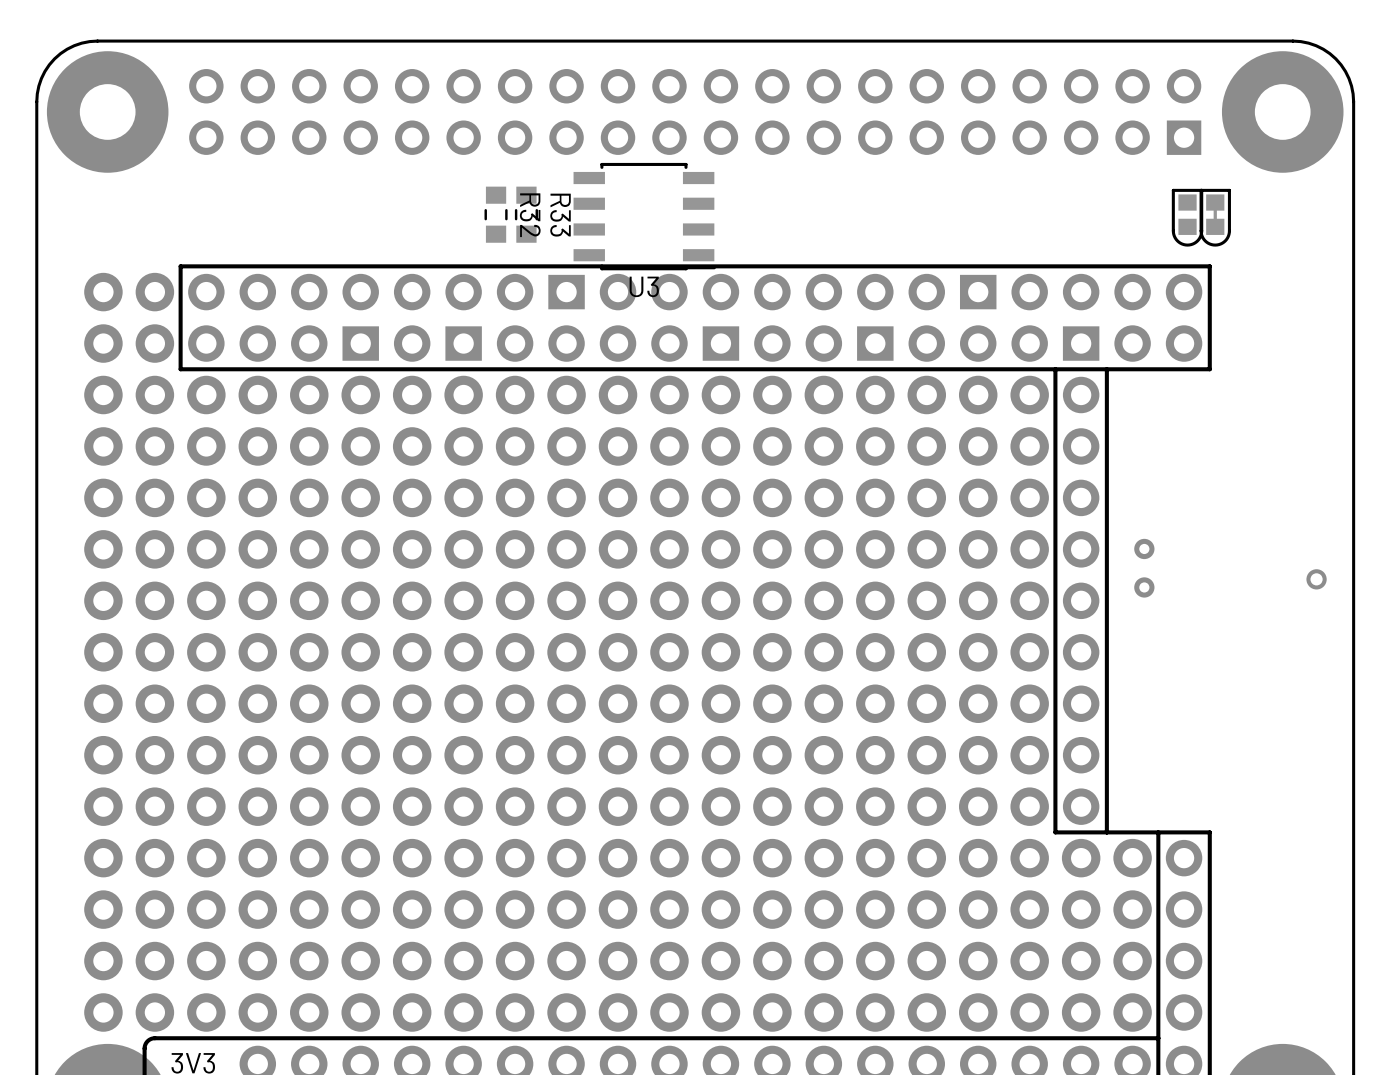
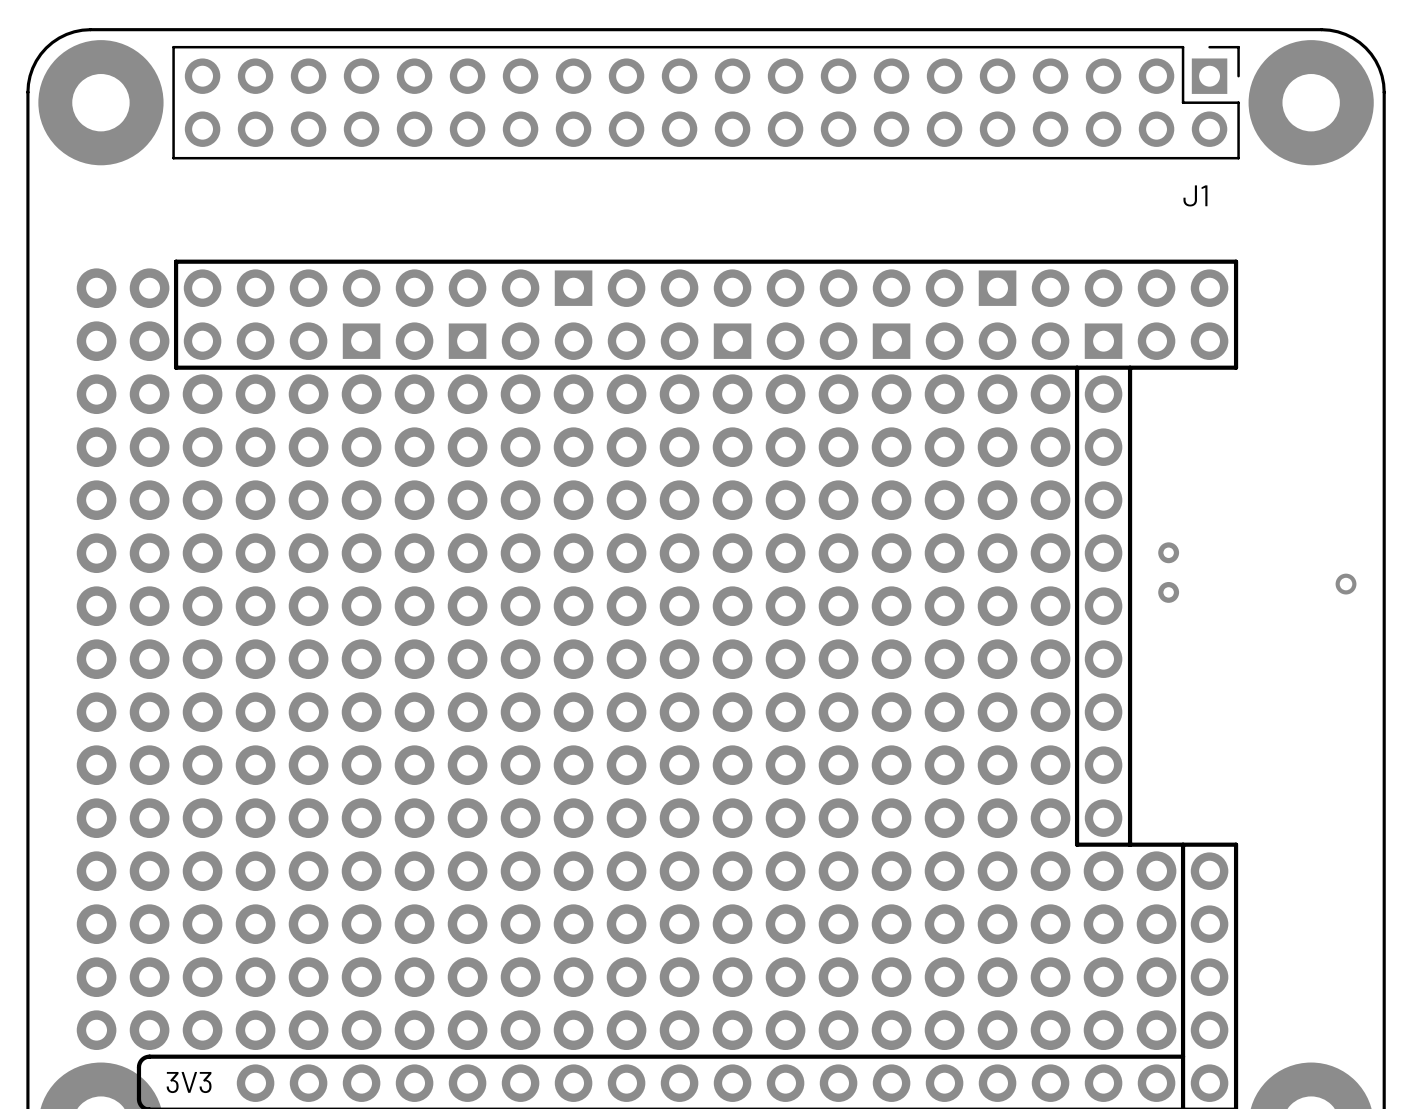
J1 side: top (695, 111) -> bottom (706, 102)
R32: (496, 214) -> none
R33: (526, 214) -> none
U3: (644, 216) -> none
part: (1187, 217) -> none
part: (1215, 217) -> none

